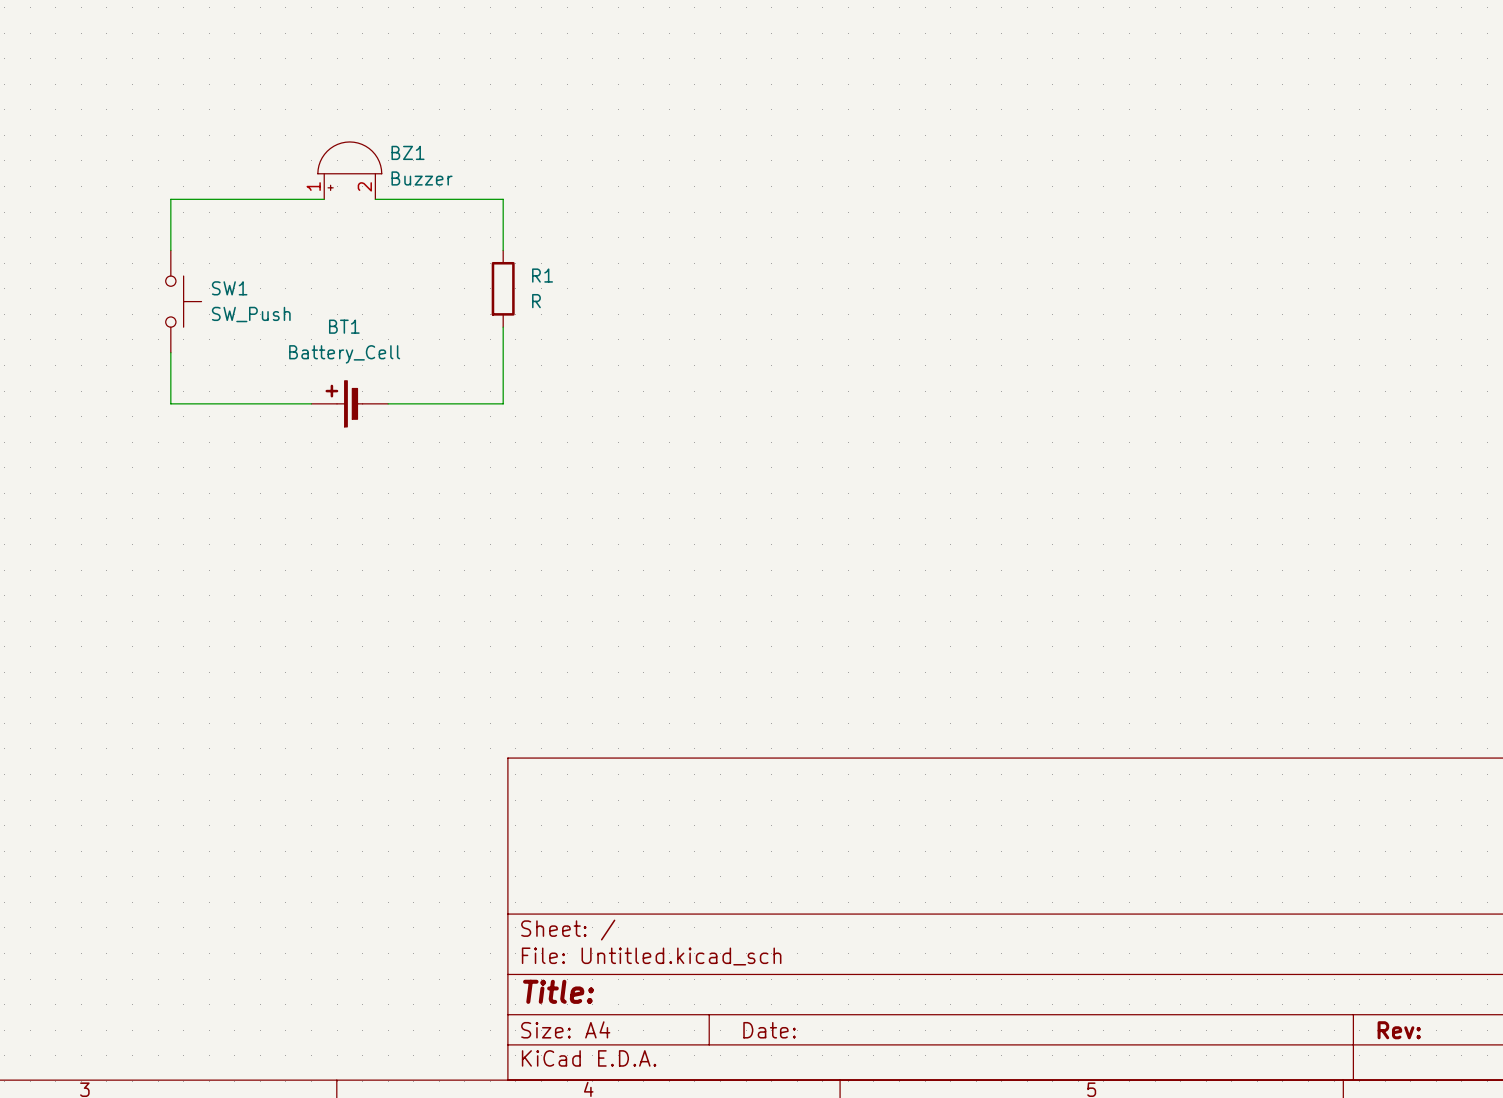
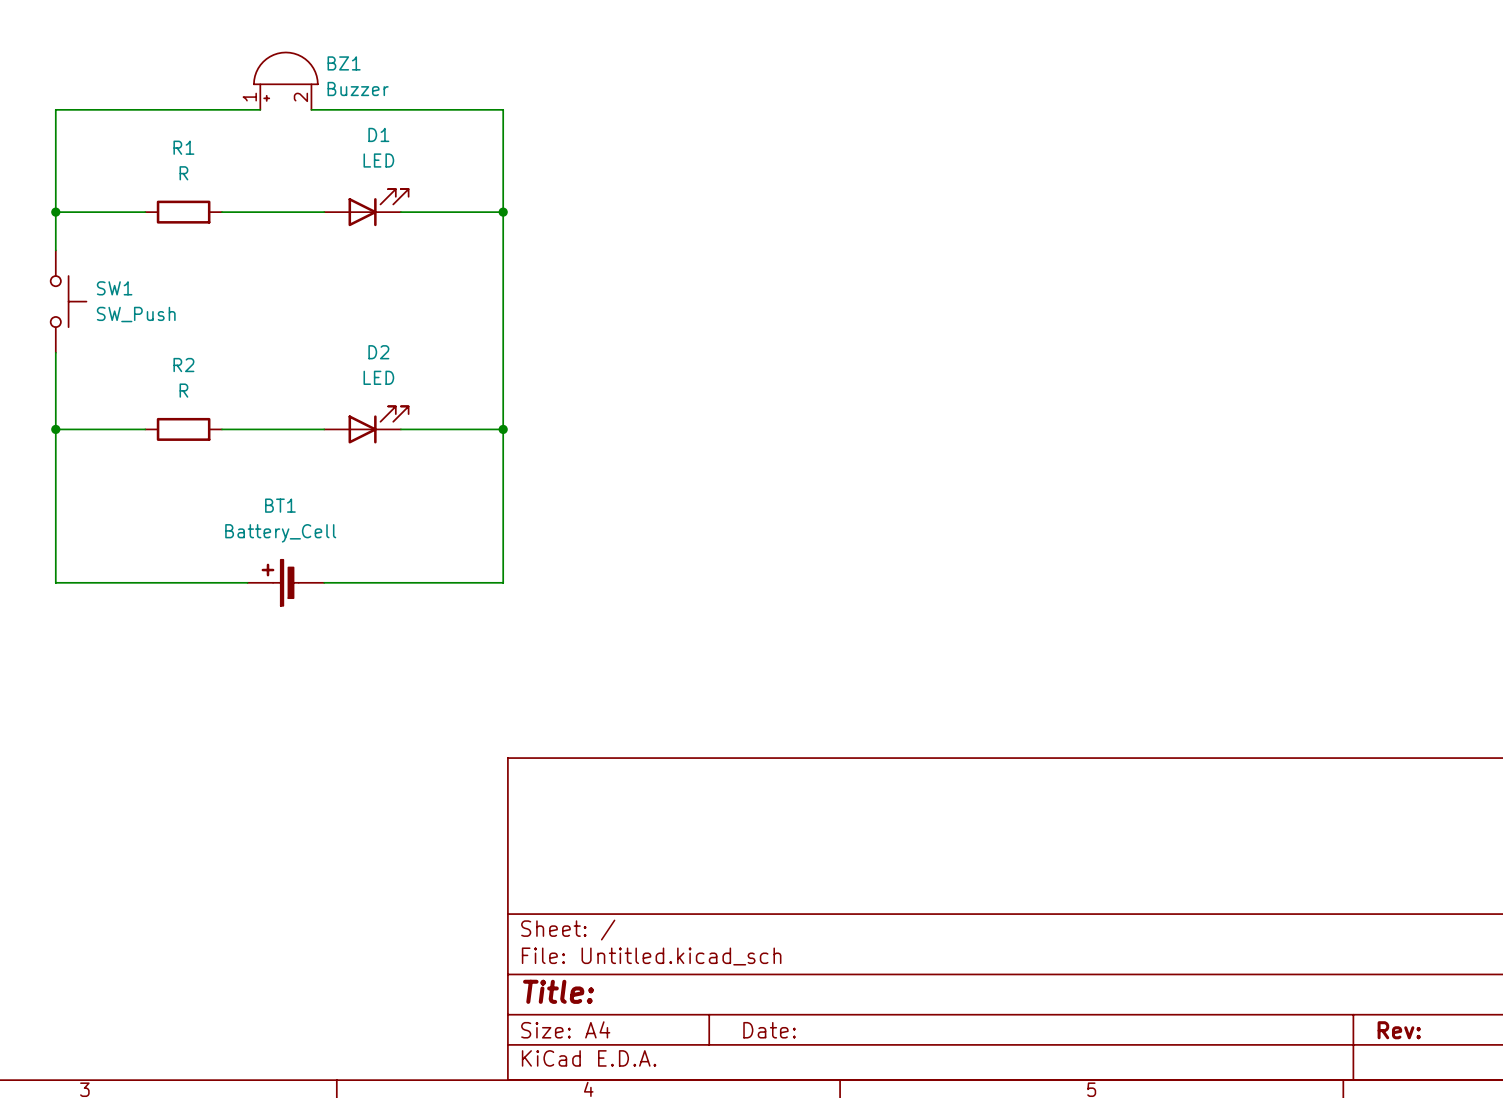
wire: none -> (260, 109) (55, 109) (55, 250)
BZ1 position: (349, 170) -> (285, 81)
wire: (324, 199) (170, 199) (170, 250) -> none
wire: (375, 199) (503, 199) -> (311, 109) (503, 109) (503, 199)
D1: none -> LED (366, 207)
wire: none -> (55, 212) (145, 212)
junction: none -> (55, 212)
wire: none -> (221, 212) (324, 212)
wire: none -> (400, 212) (503, 212)
junction: none -> (503, 212)
wire: none -> (503, 250) (503, 327)
R1 name position: R1 (542, 275) -> R1 (183, 147)
R1 rotation: 0° (503, 288) -> 90° clockwise (183, 212)
R1 position: (503, 288) -> (183, 212)
SW1 position: (183, 301) -> (68, 301)
R1 value position: R (536, 301) -> R (183, 173)
wire: none -> (55, 352) (55, 582) (247, 582)
wire: (170, 352) (170, 403) (311, 403) -> none
BT1 position: (349, 403) -> (285, 582)
wire: (388, 403) (503, 403) -> (324, 582) (503, 582) (503, 403)
D2: none -> LED (366, 424)
wire: none -> (55, 429) (145, 429)
junction: none -> (55, 429)
R2: none -> R (183, 429)
wire: none -> (221, 429) (324, 429)
wire: none -> (400, 429) (503, 429)
junction: none -> (503, 429)

